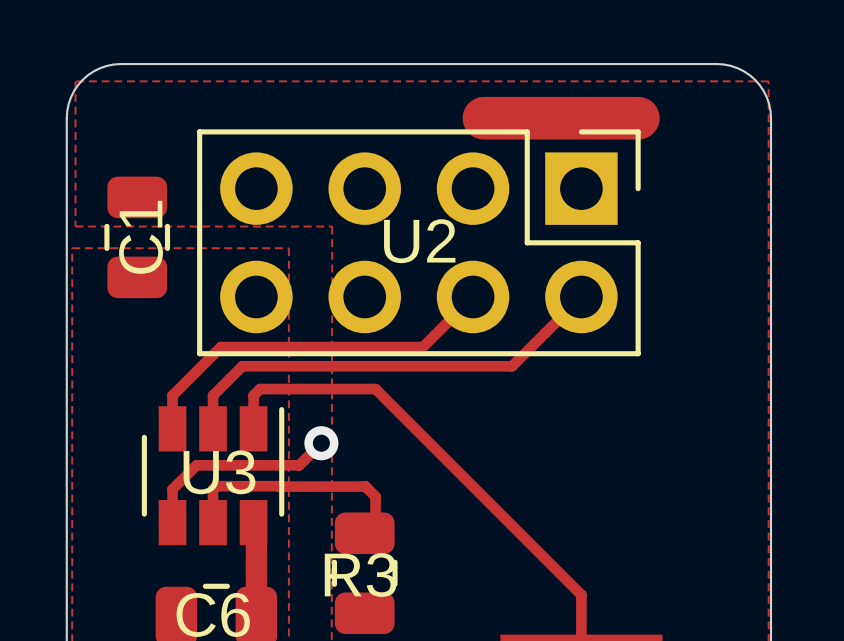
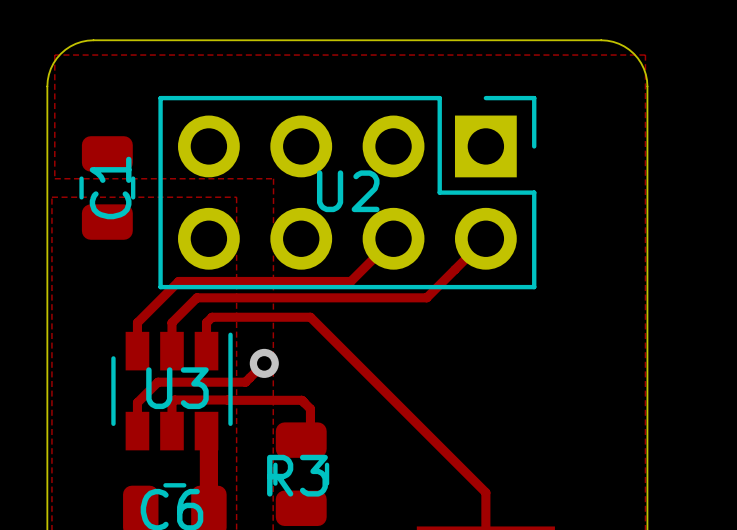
track: (483, 118) (638, 118) -> none

